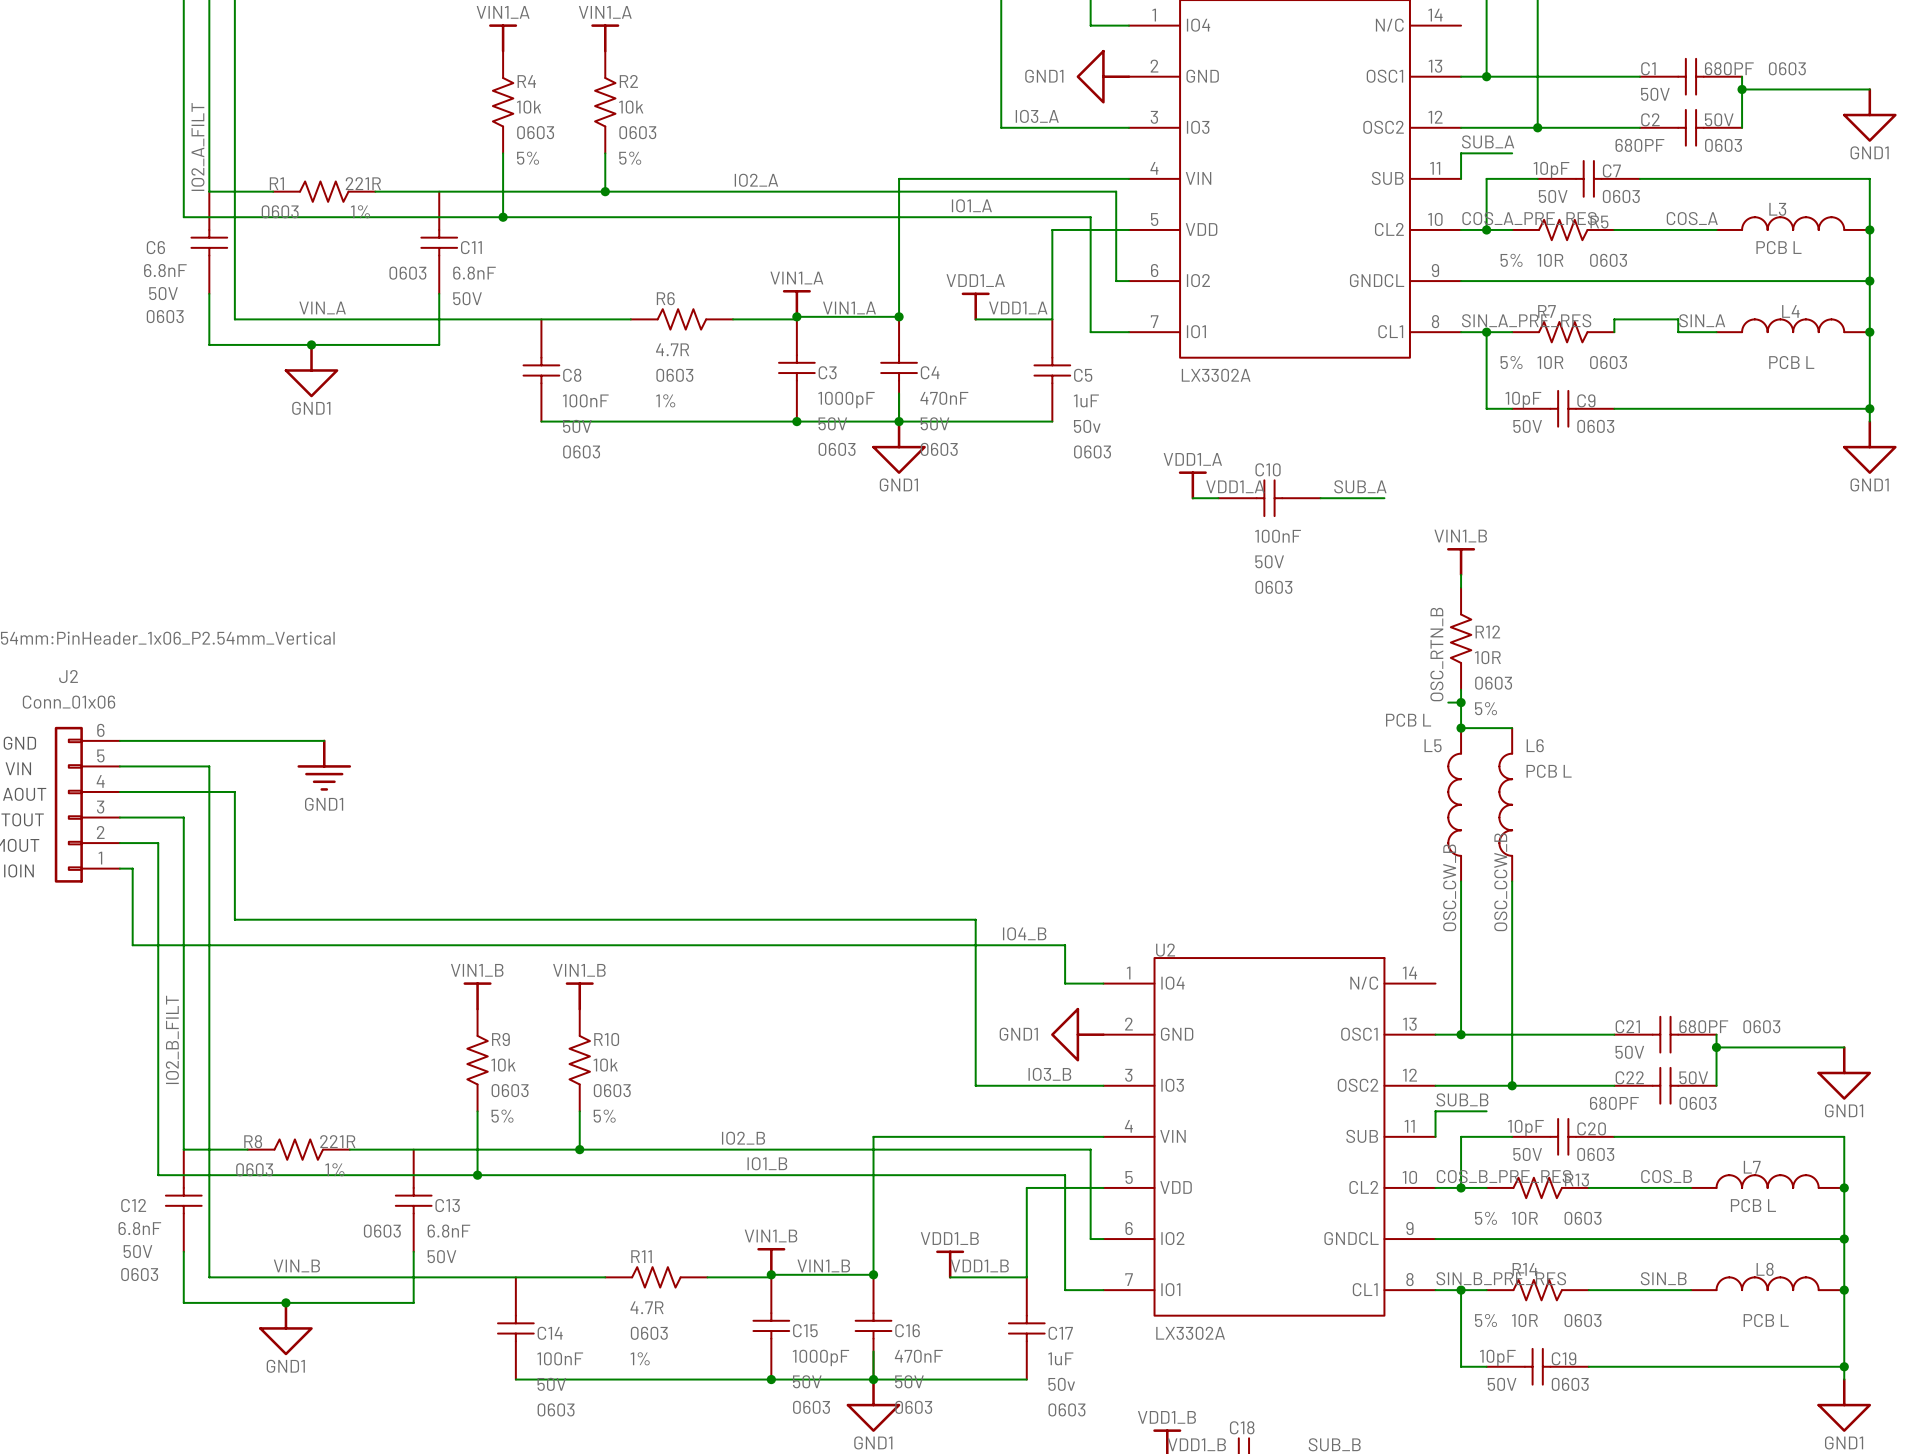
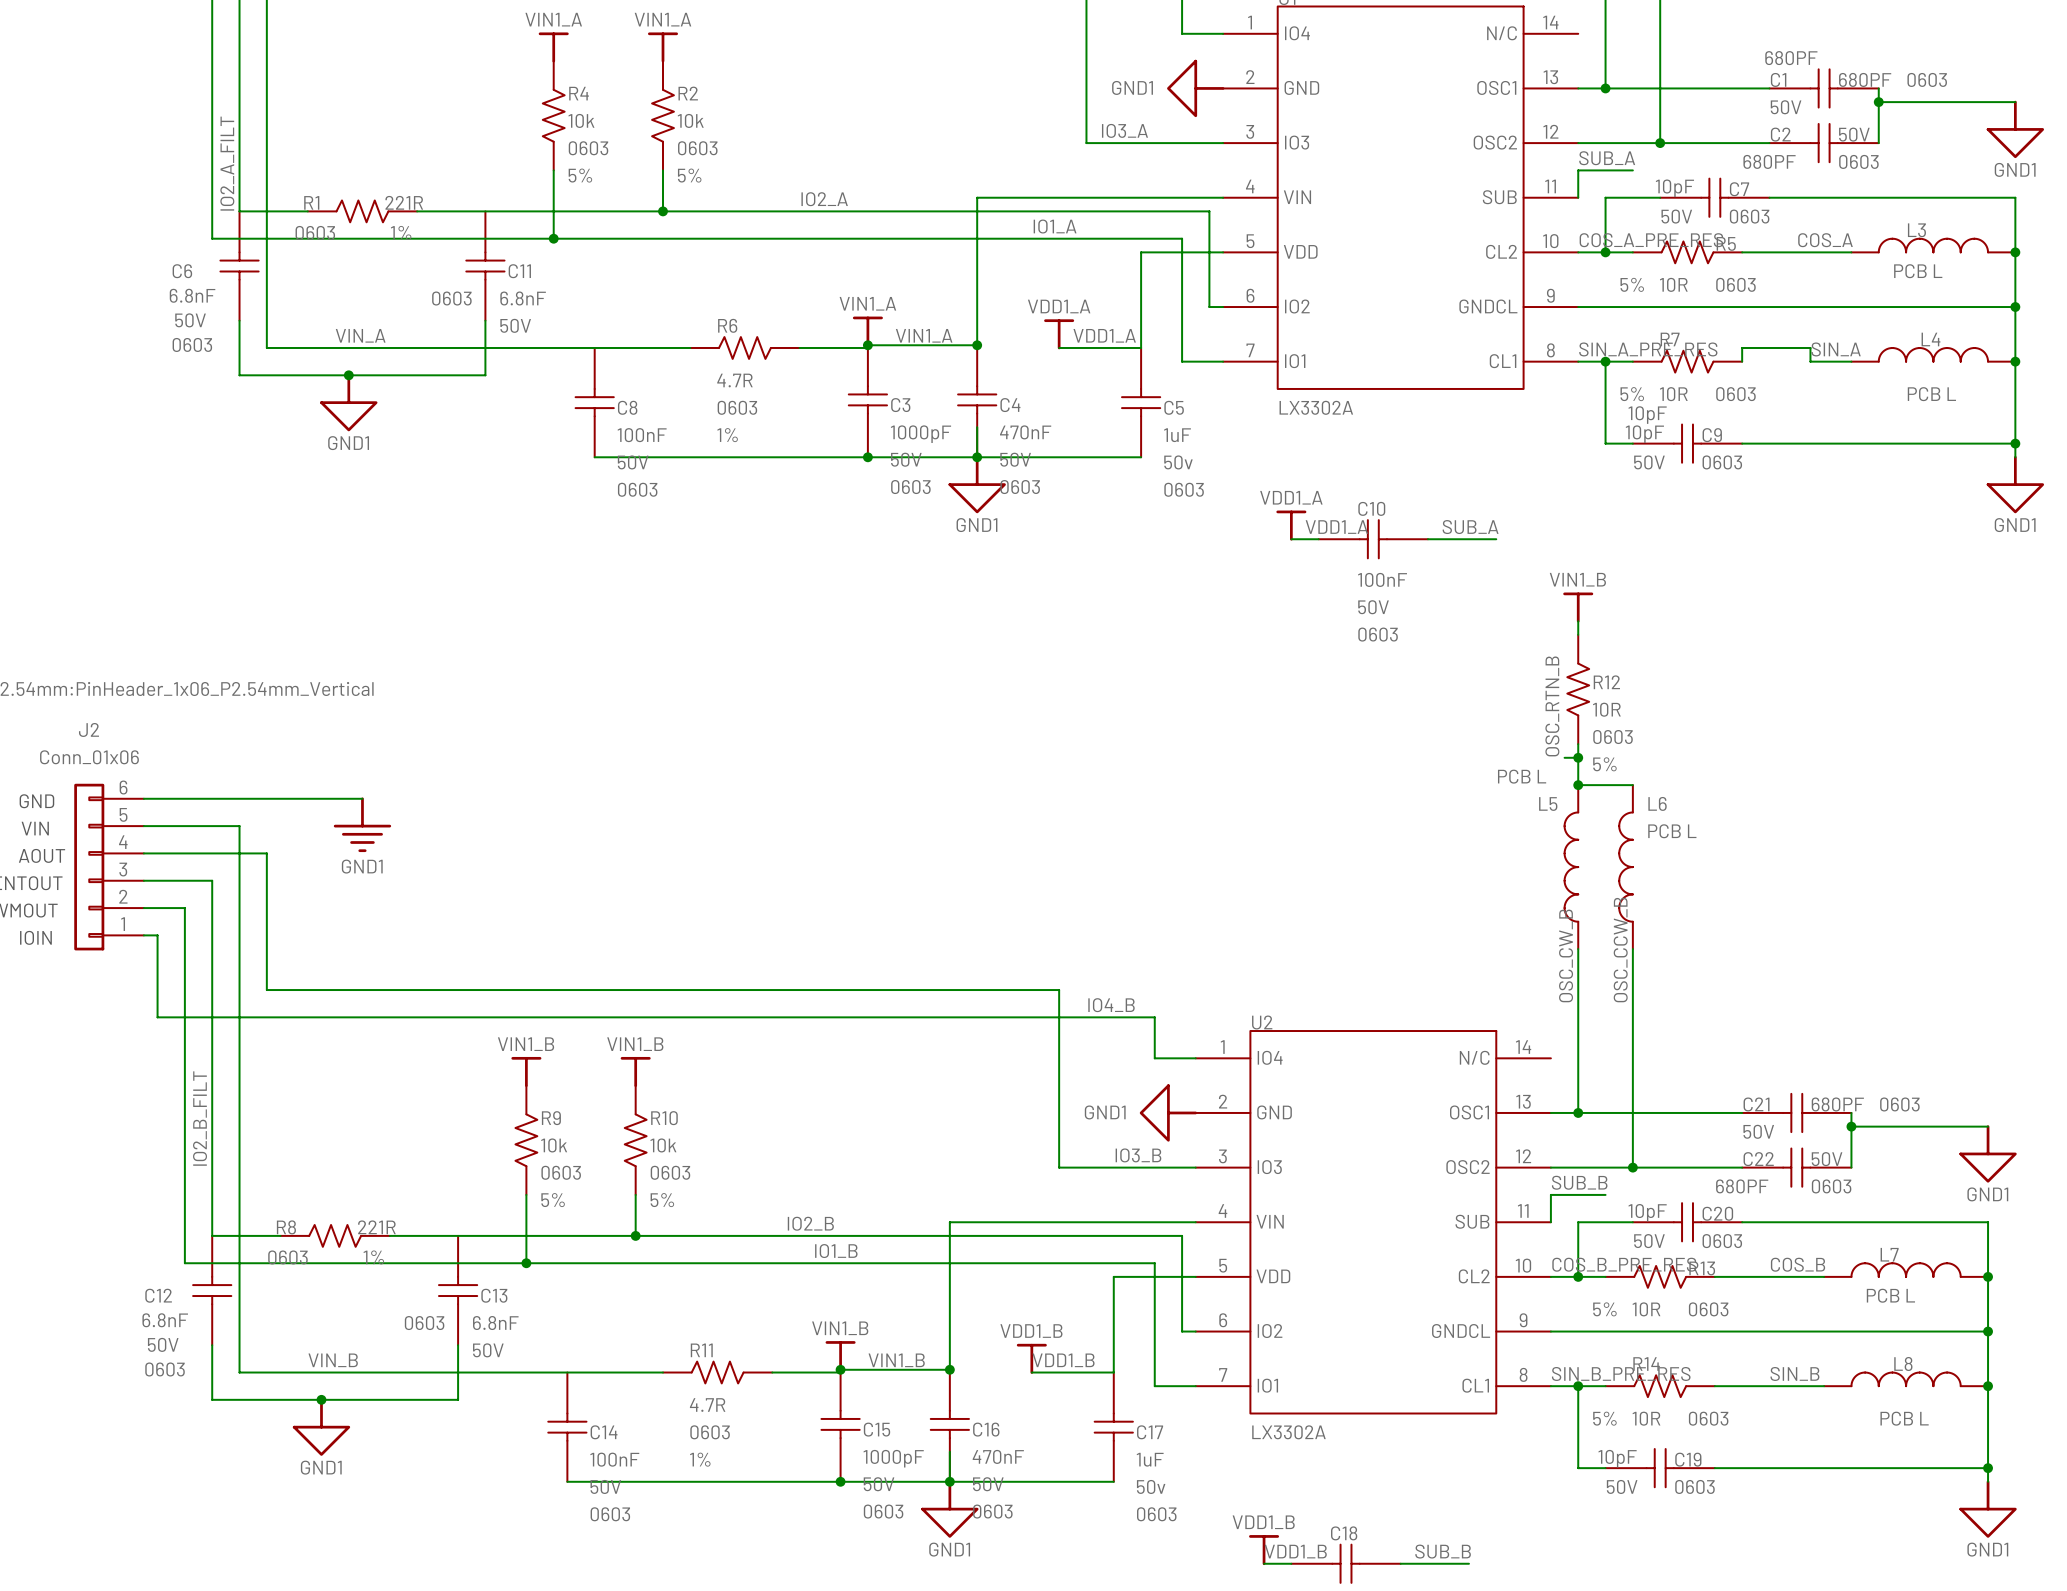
C1 value: none -> 680PF (1791, 58)
C9 value: none -> 10pF (1647, 415)

